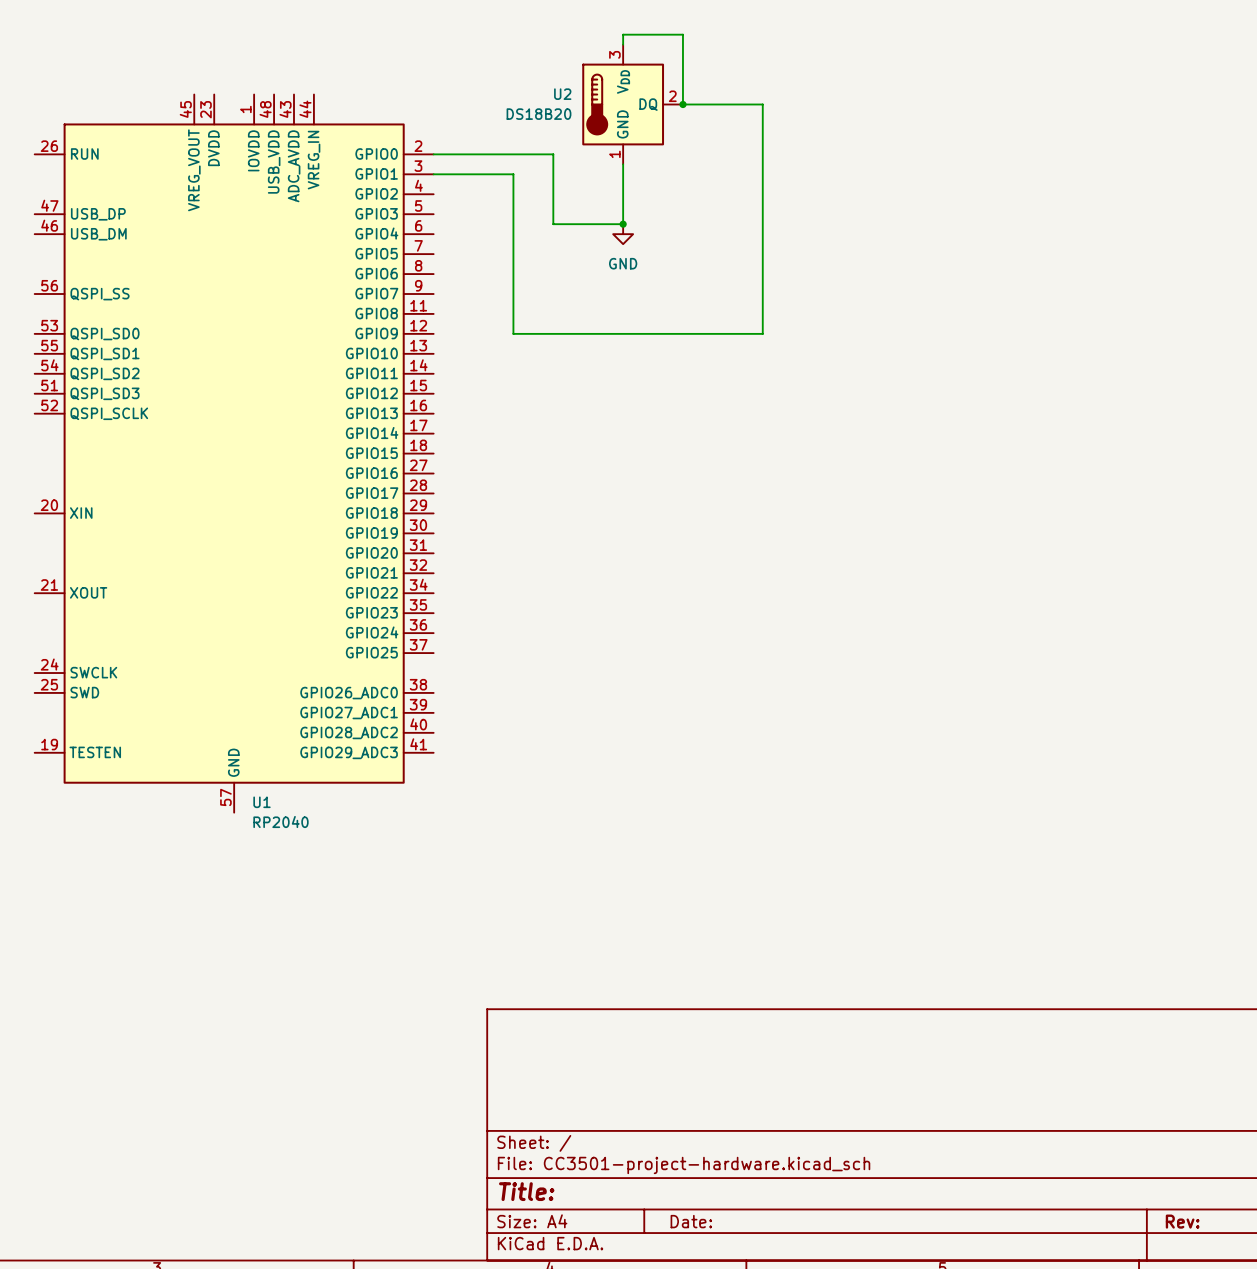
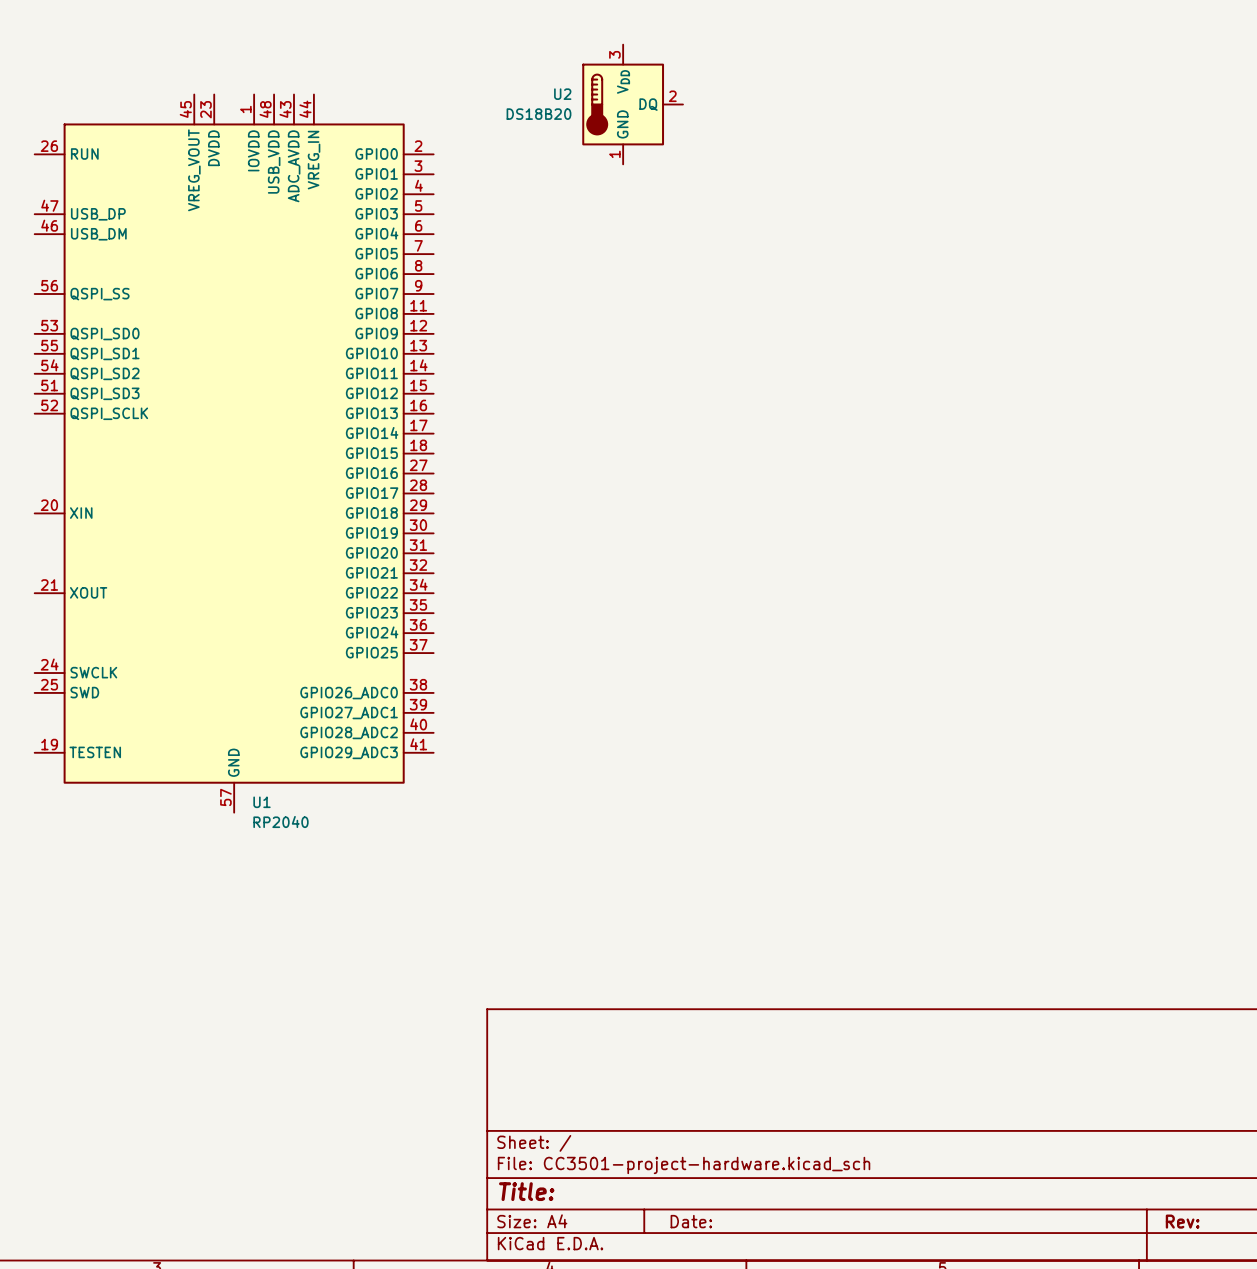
wire: (623, 44) (623, 34) (682, 34) (682, 104) (762, 104) (762, 333) (513, 333) (513, 174) (433, 174) -> none
junction: (682, 104) -> none
wire: (433, 154) (553, 154) (553, 224) (623, 224) (623, 164) -> none
junction: (623, 224) -> none
power symbol: GND (623, 234) -> none

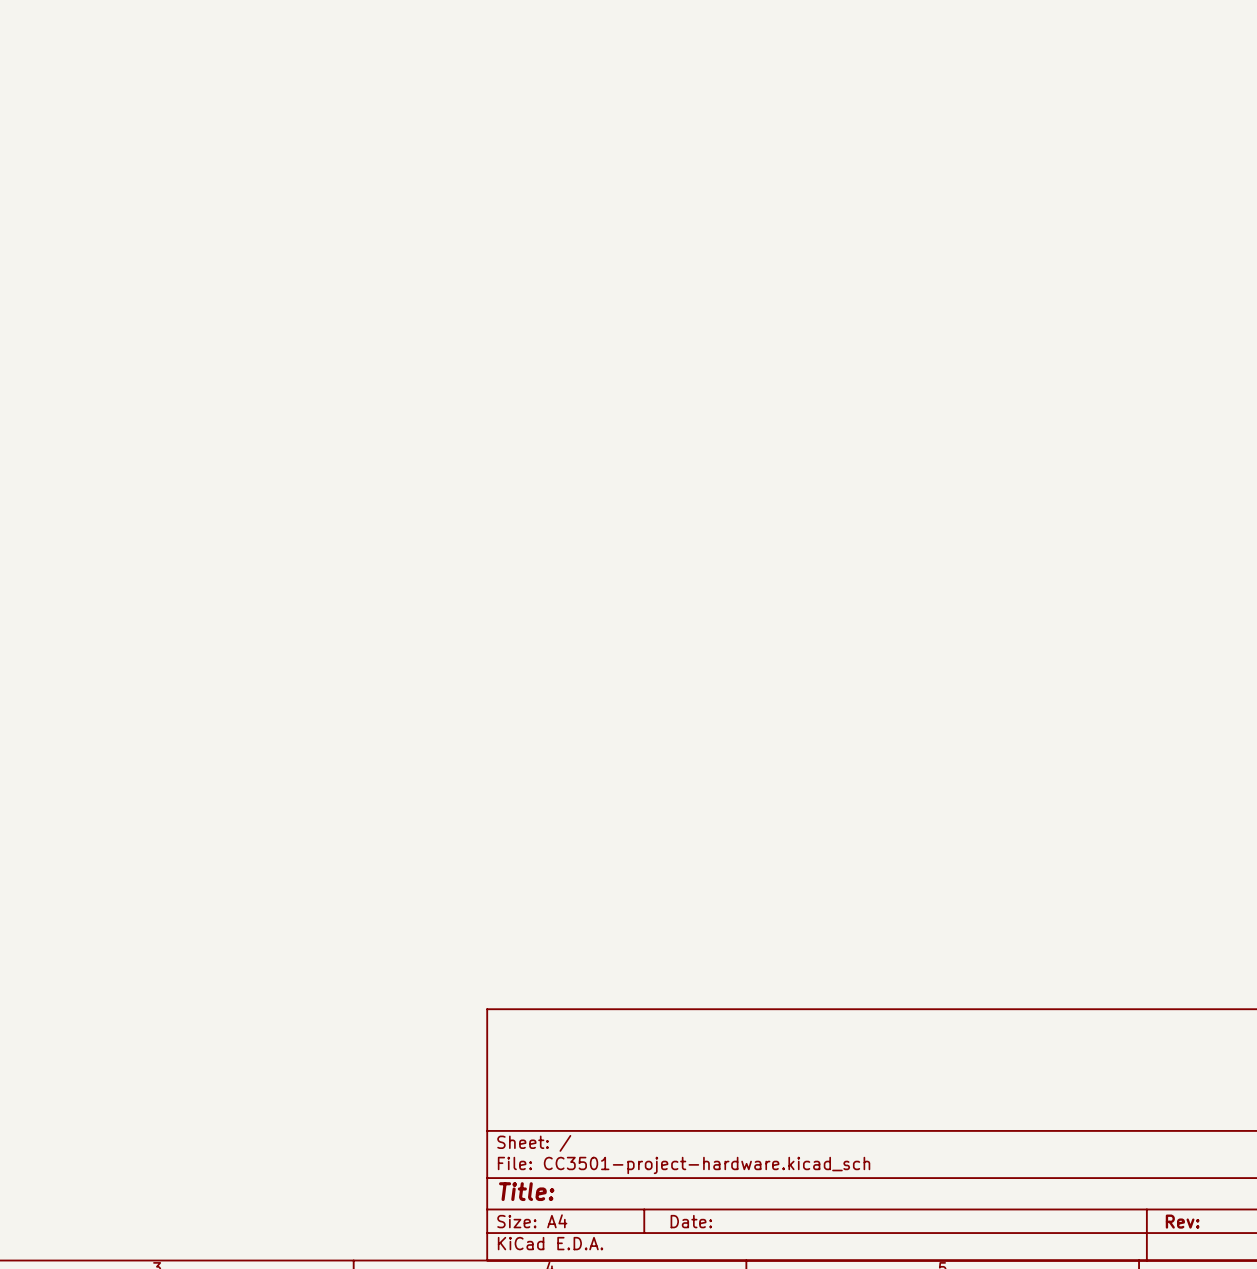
U2: DS18B20 (632, 104) -> none
U1: RP2040 (234, 453) -> none

